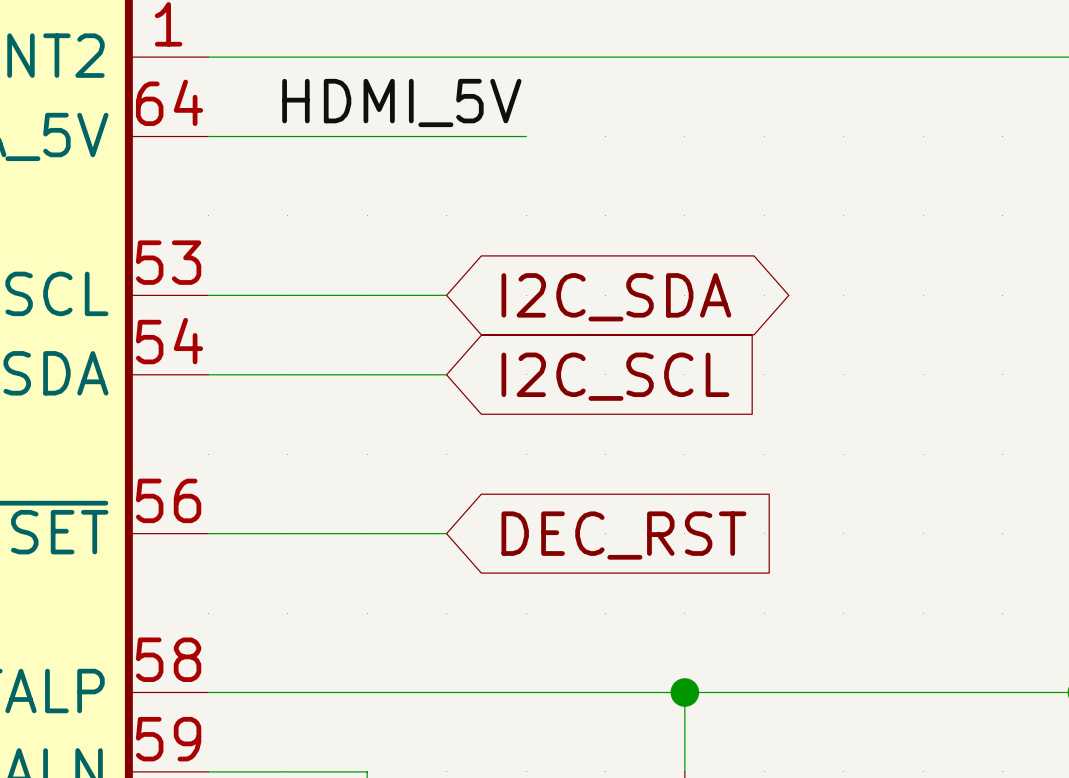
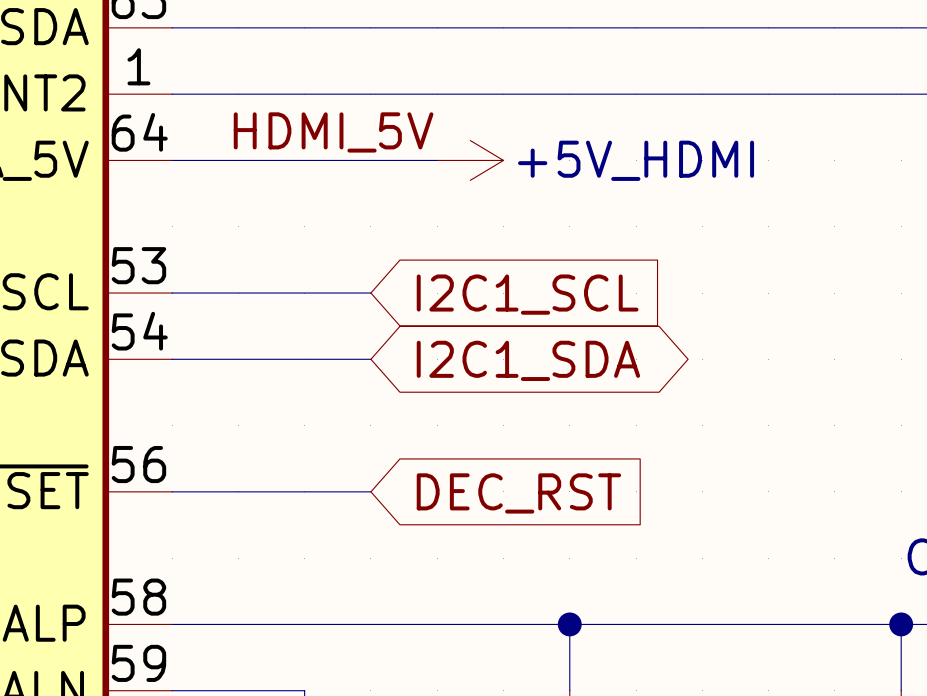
power symbol: none -> +5V_HDMI (470, 160)
global label shape: bidirectional (616, 297) -> input (527, 294)
global label: I2C_SDA (616, 297) -> I2C1_SCL (527, 294)
global label shape: input (615, 376) -> bidirectional (528, 360)
global label: I2C_SCL (615, 376) -> I2C1_SDA (528, 360)

